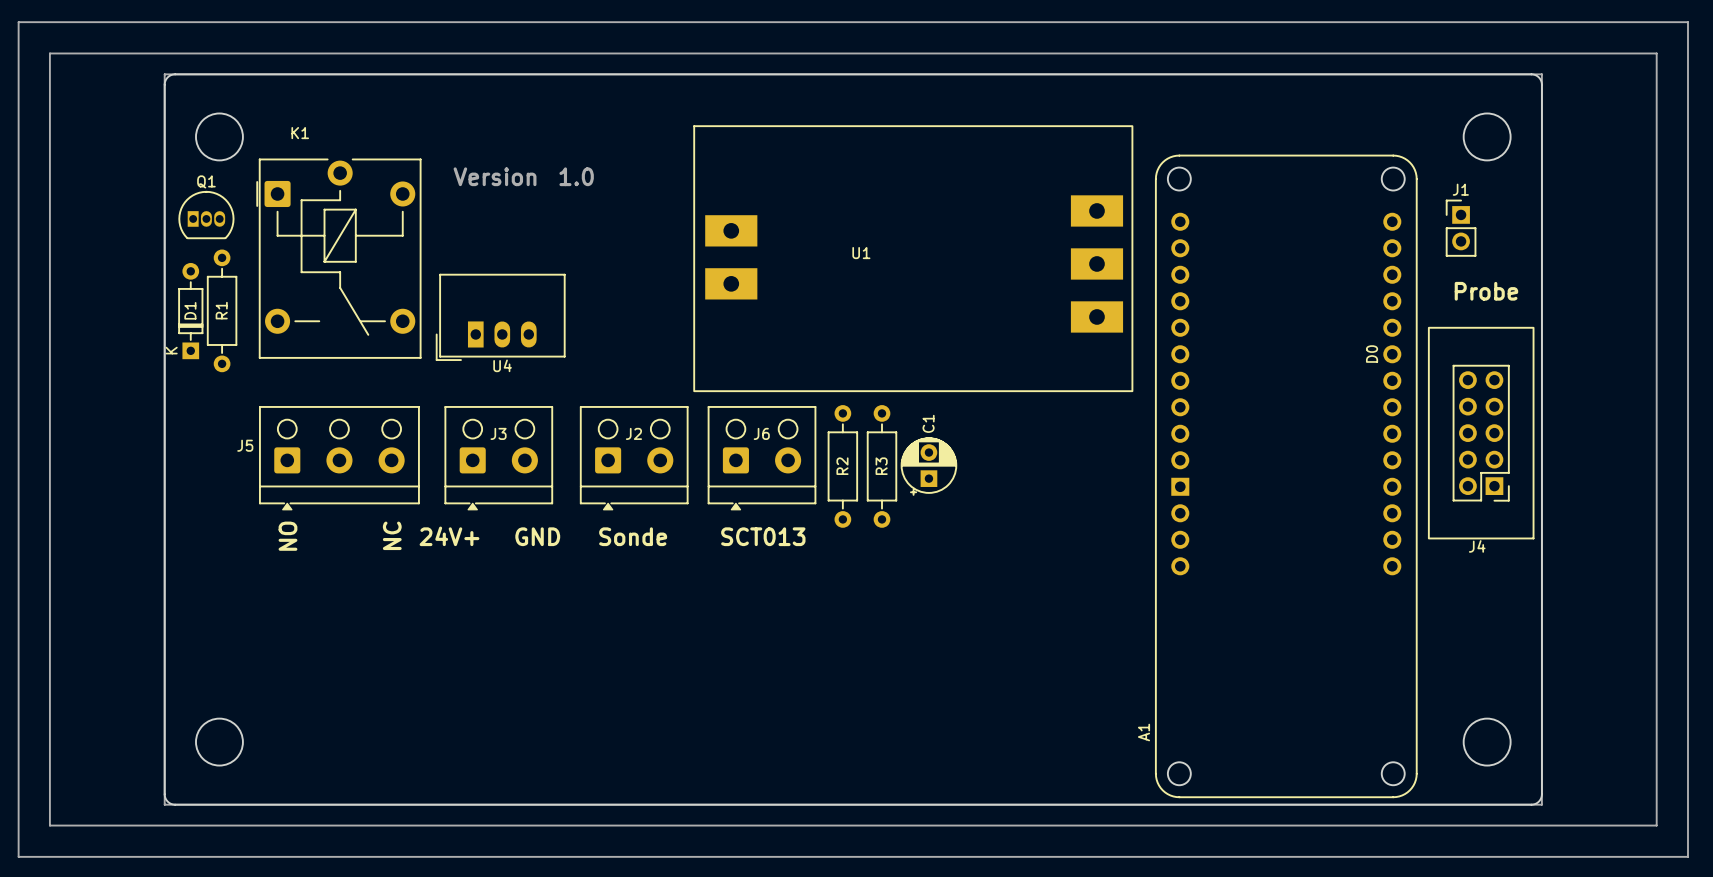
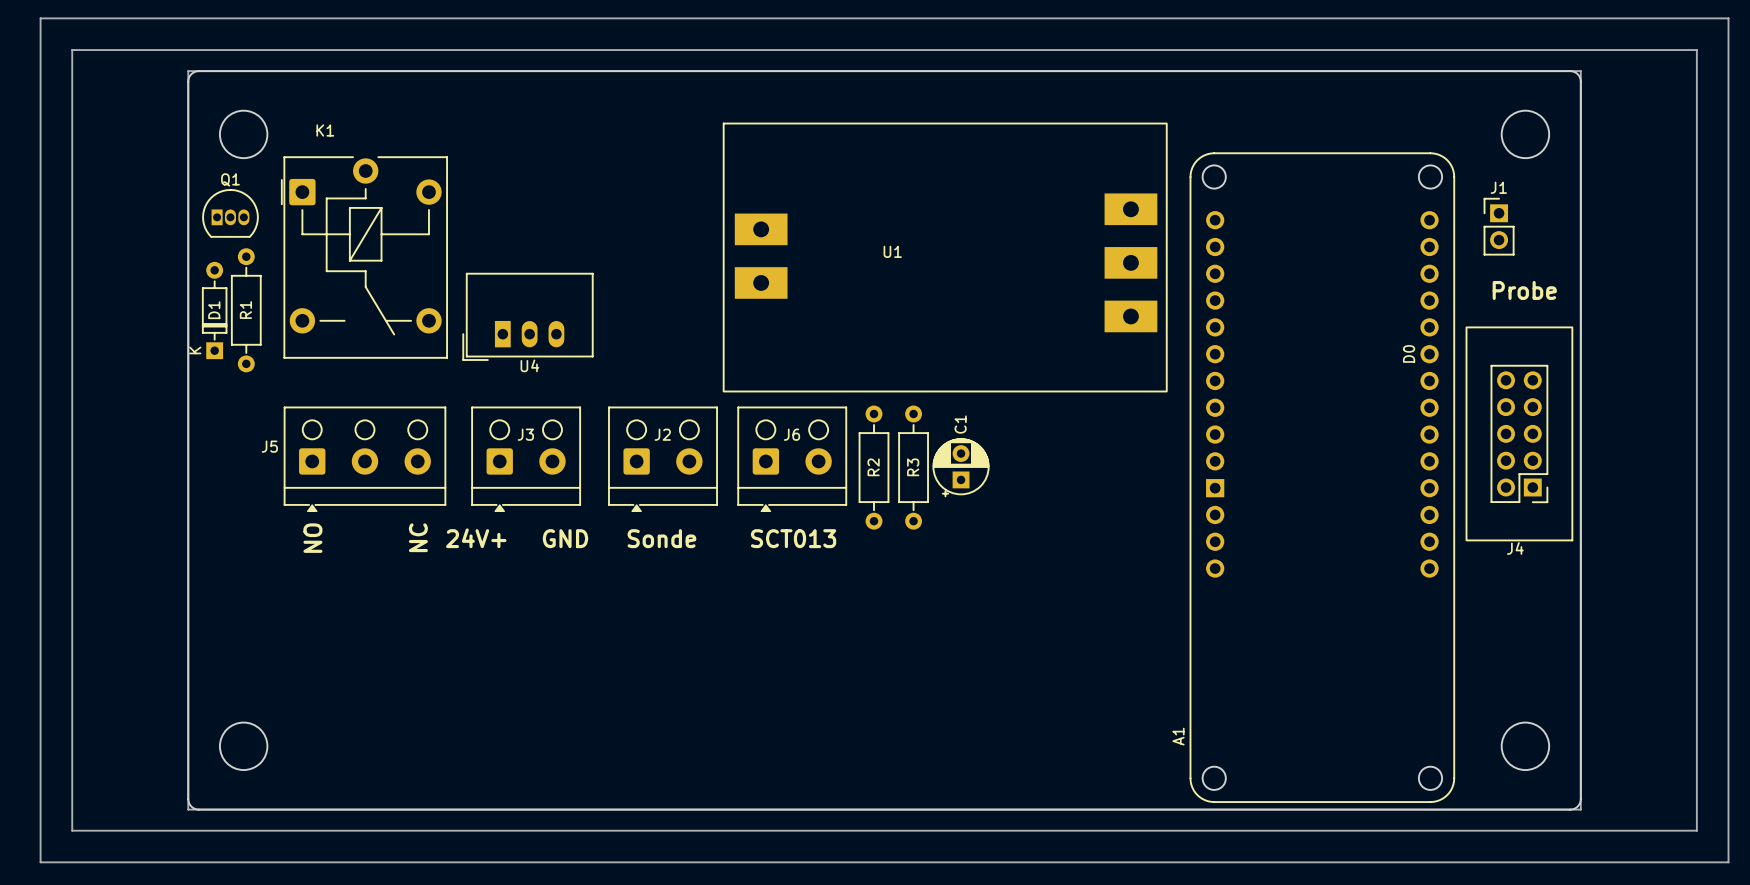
text: Version (495, 176) -> none
text: 1.0 (576, 176) -> none

